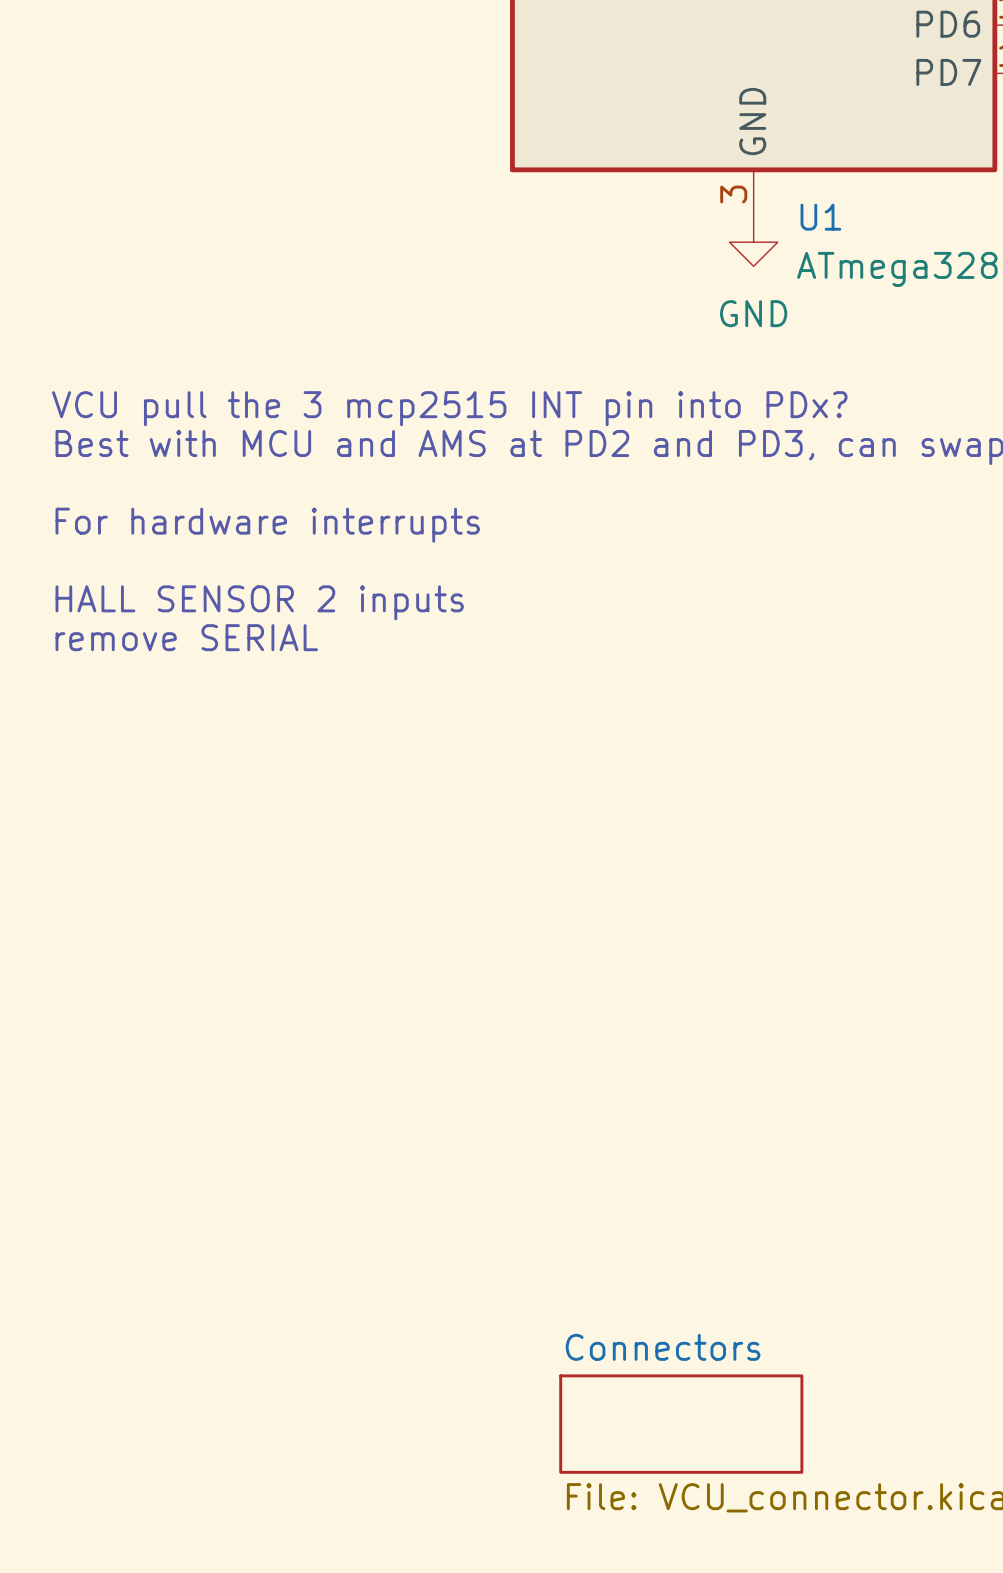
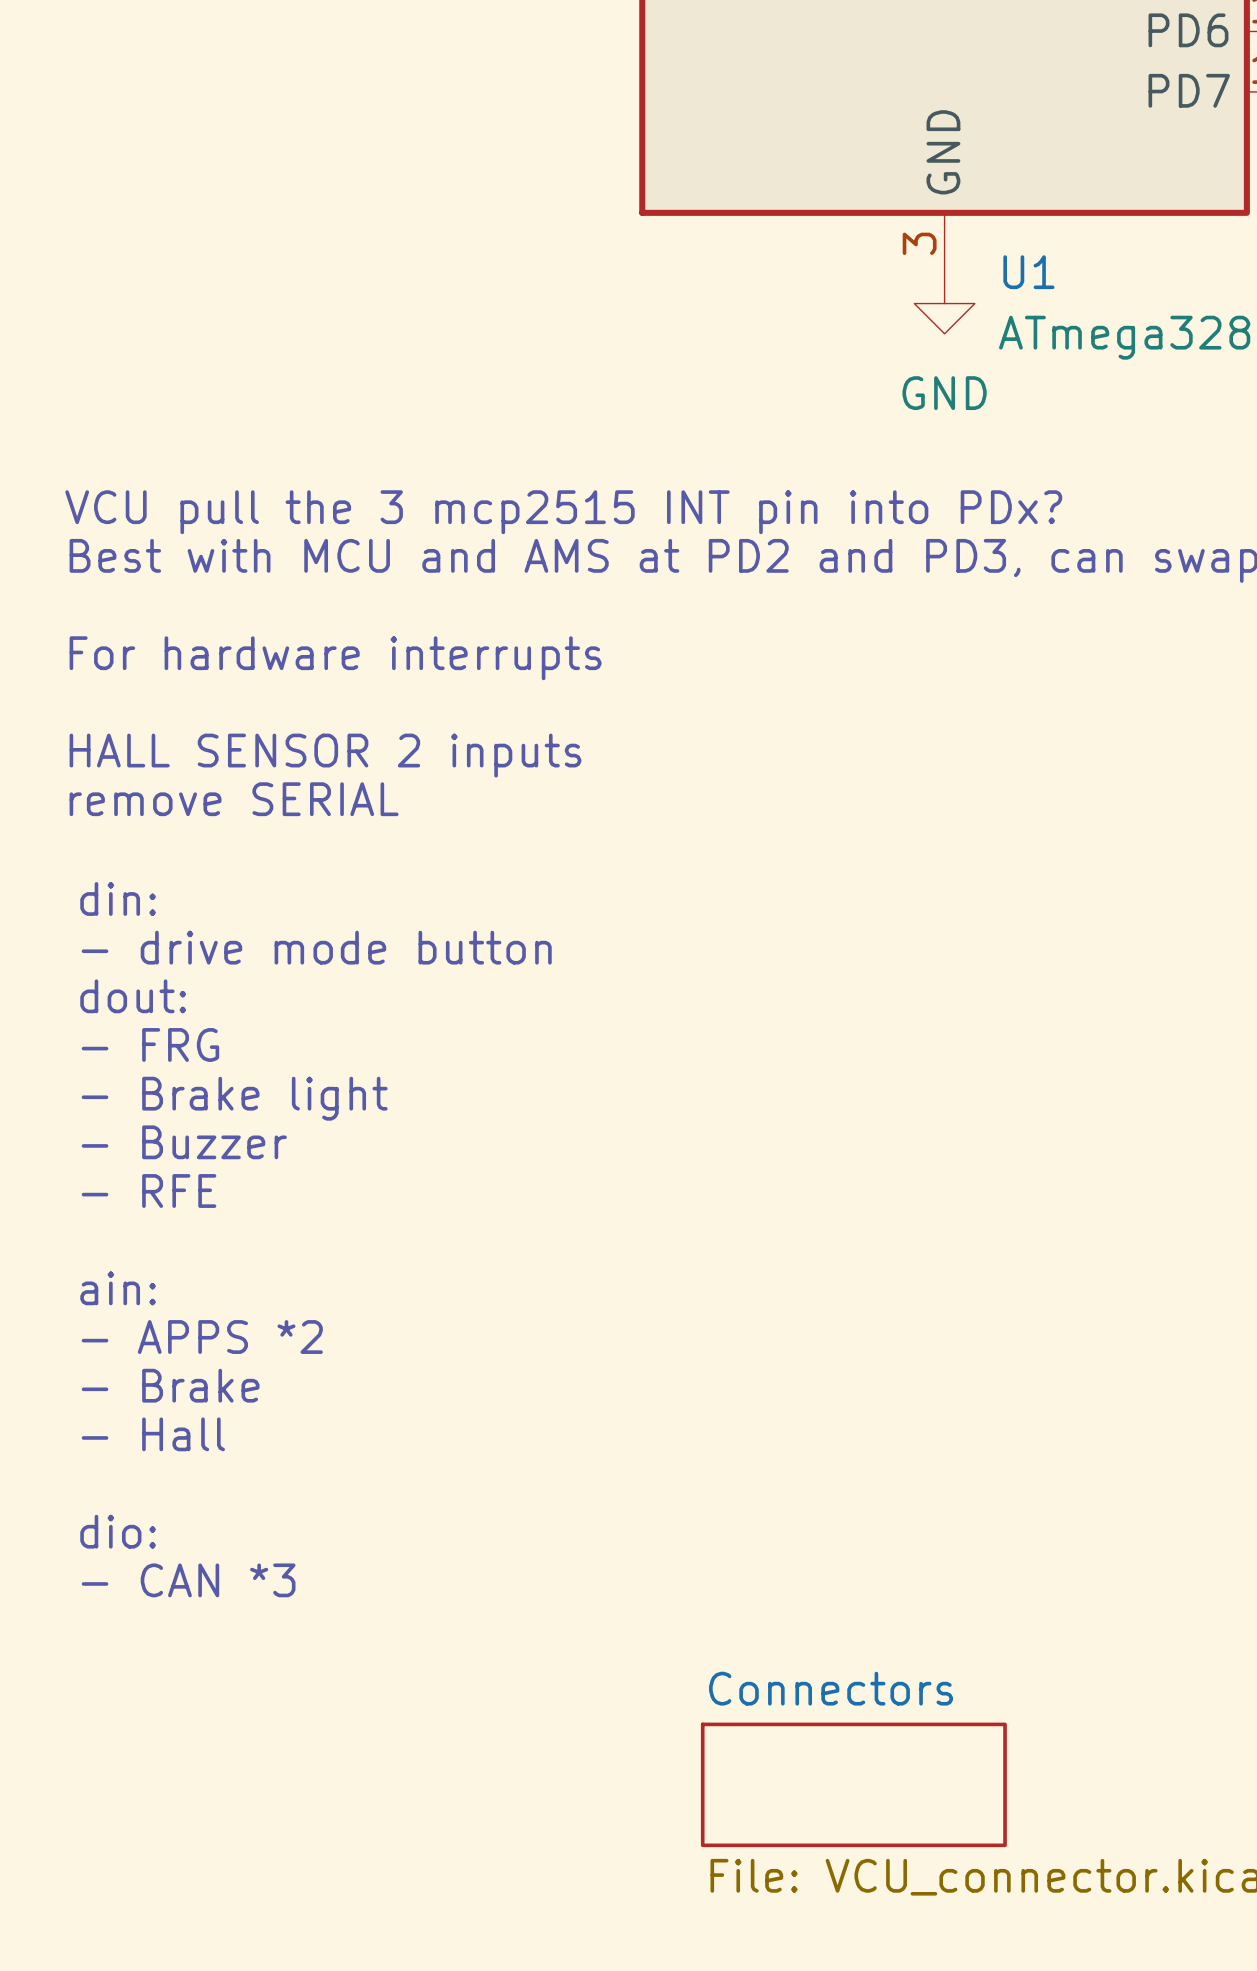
text: none -> din: (118, 898)
text: none -> - drive mode button (316, 947)
text: none -> dout: (133, 996)
text: none -> - FRG (150, 1044)
text: none -> - Brake light (234, 1098)
text: none -> - Buzzer (184, 1142)
text: none -> - RFE (149, 1191)
text: none -> ain: (118, 1288)
text: none -> - APPS *2 (202, 1337)
text: none -> - Brake (170, 1385)
text: none -> - Hall (153, 1434)
text: none -> dio: (118, 1531)
text: none -> - CAN *3 (188, 1580)

